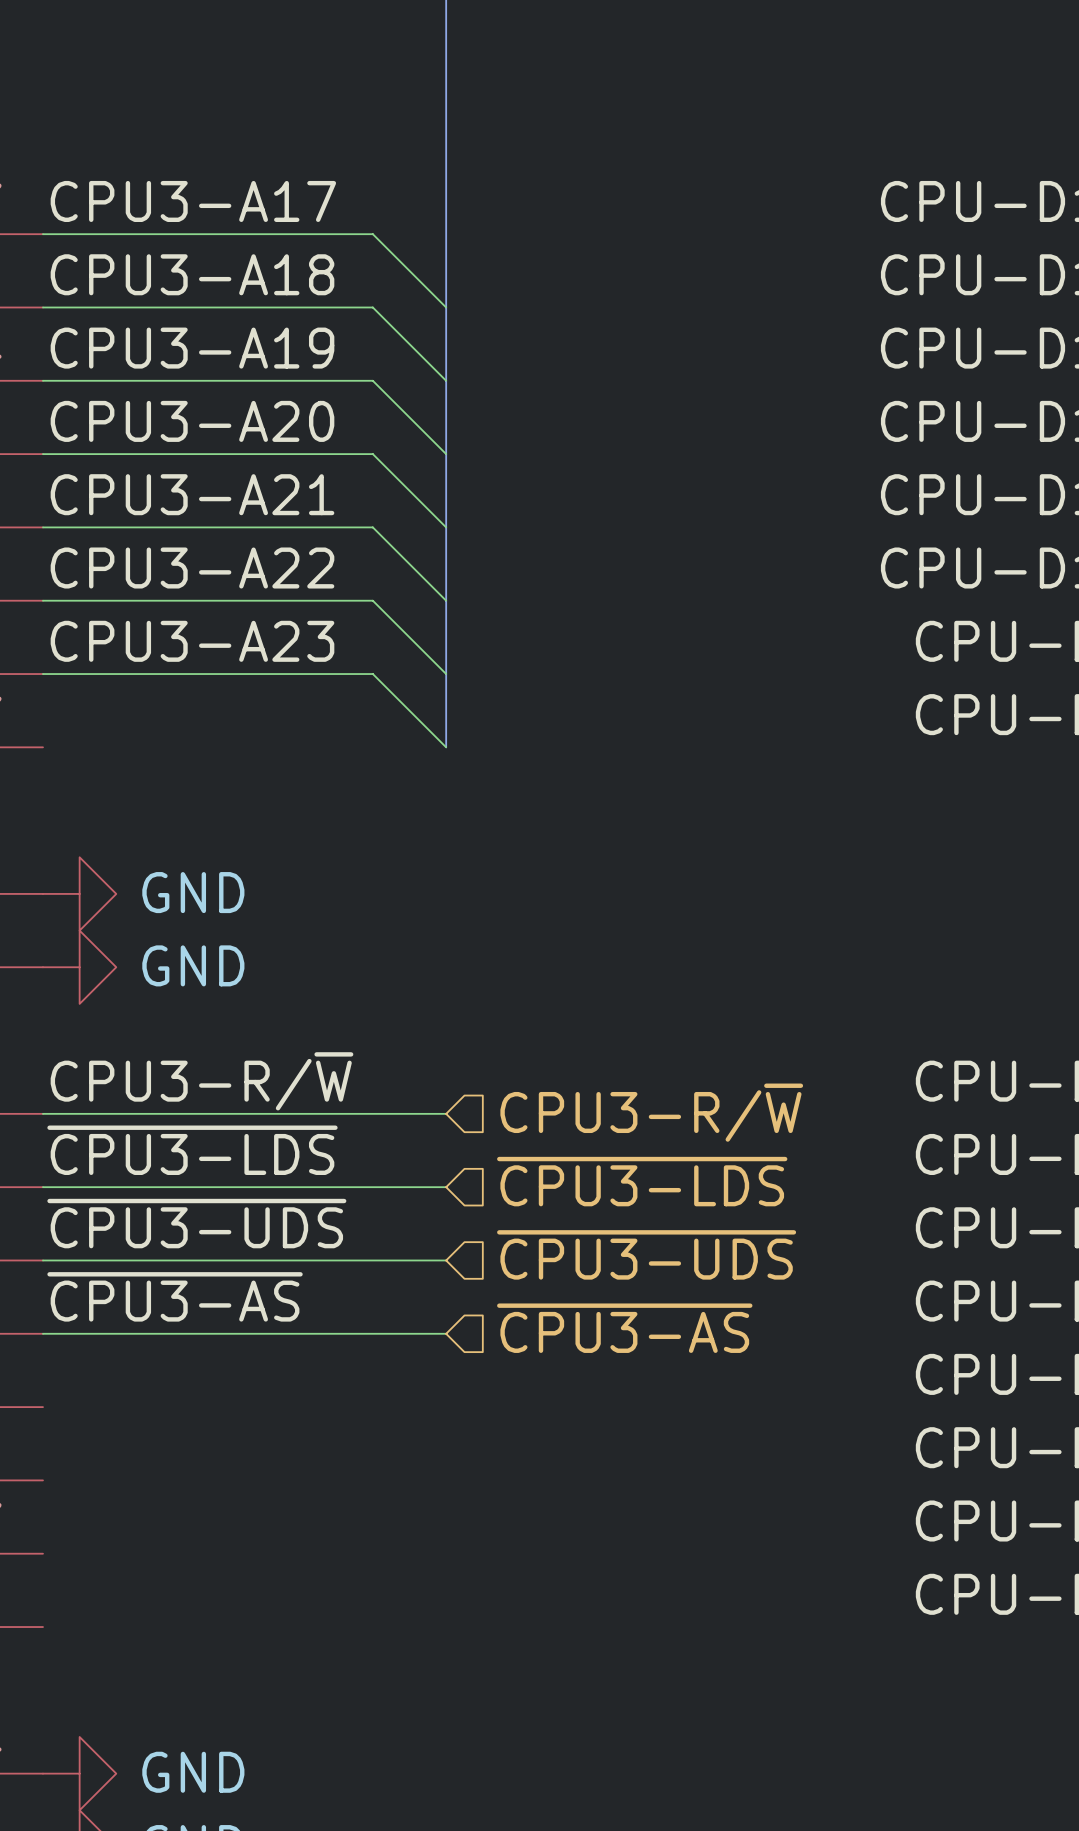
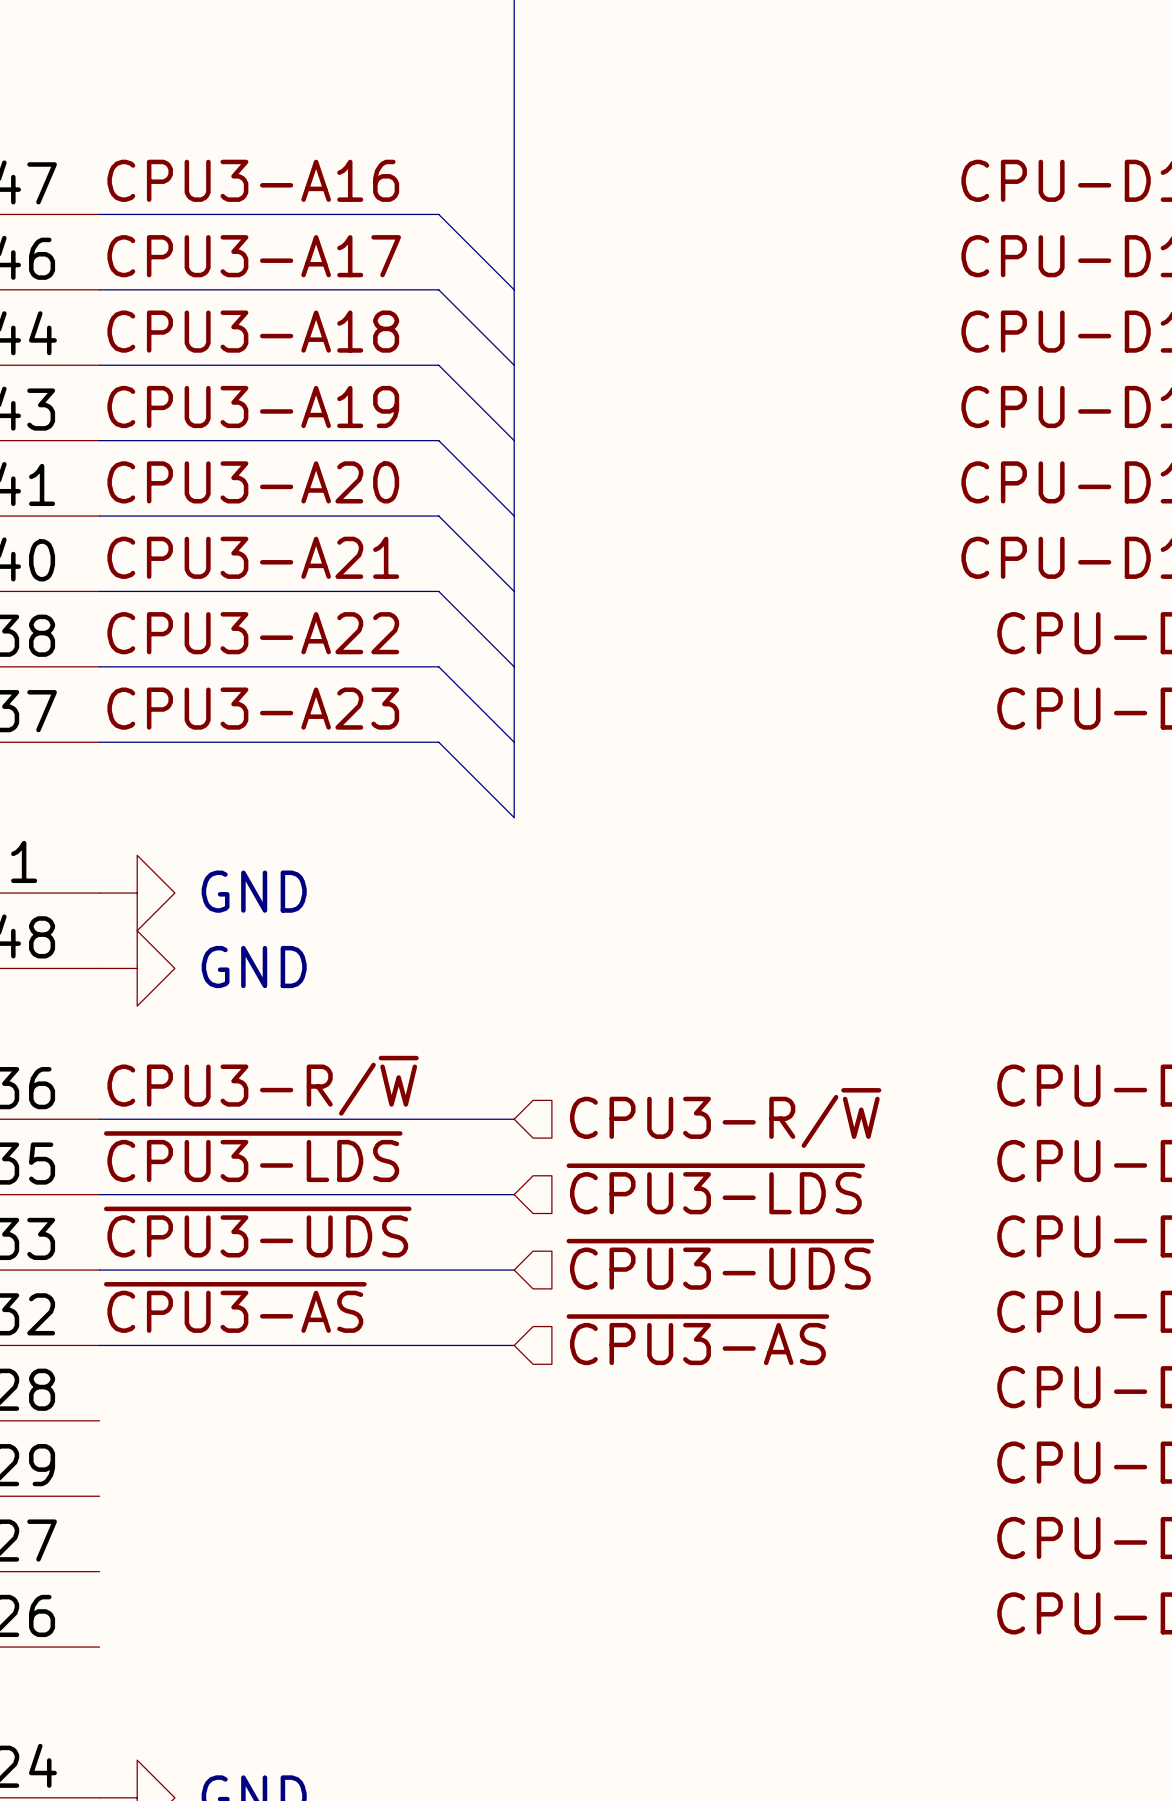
label: CPU3-A17 (193, 201) -> CPU3-A16 (253, 180)
label: CPU3-A18 (192, 274) -> CPU3-A17 (254, 256)
label: CPU3-A19 (192, 348) -> CPU3-A18 (253, 331)
label: CPU3-A20 (192, 421) -> CPU3-A19 (253, 407)
label: CPU3-A21 (192, 494) -> CPU3-A20 (253, 482)
label: CPU3-A22 (192, 568) -> CPU3-A21 (253, 557)
label: CPU3-A23 (192, 641) -> CPU3-A22 (253, 633)
label: none -> CPU3-A23 (253, 708)
wire: none -> (99, 742) (438, 742) (514, 817)
bus: none -> (514, 742) (514, 817)

